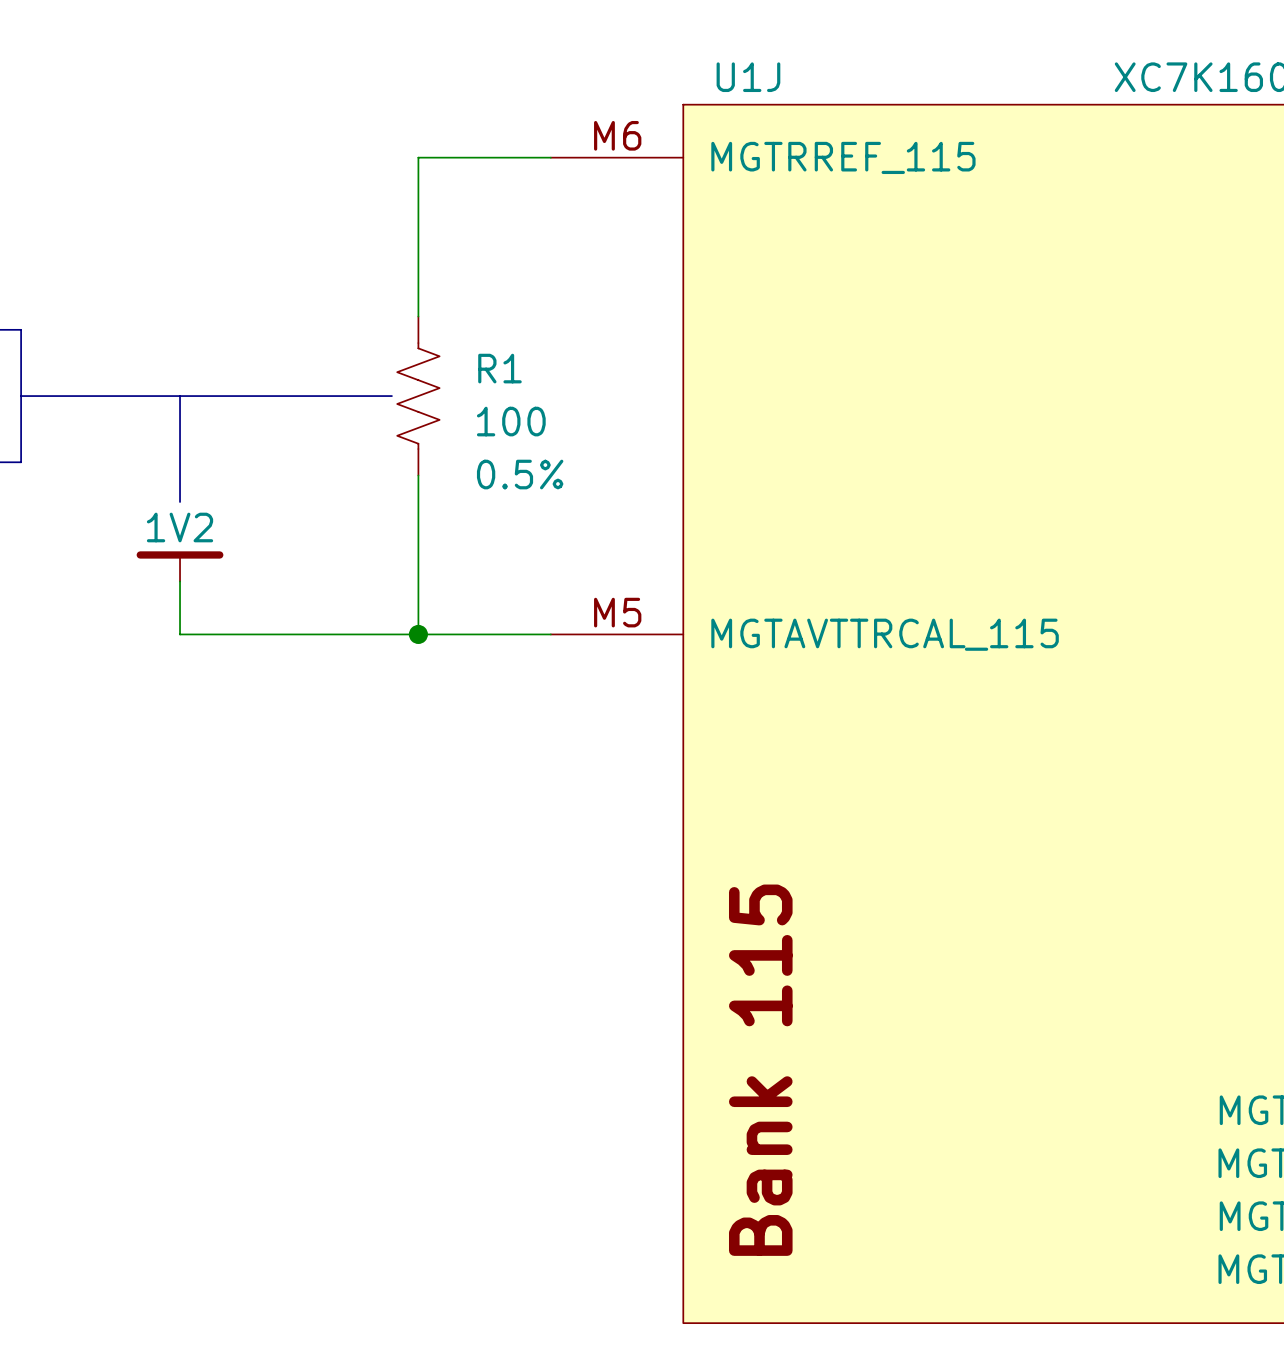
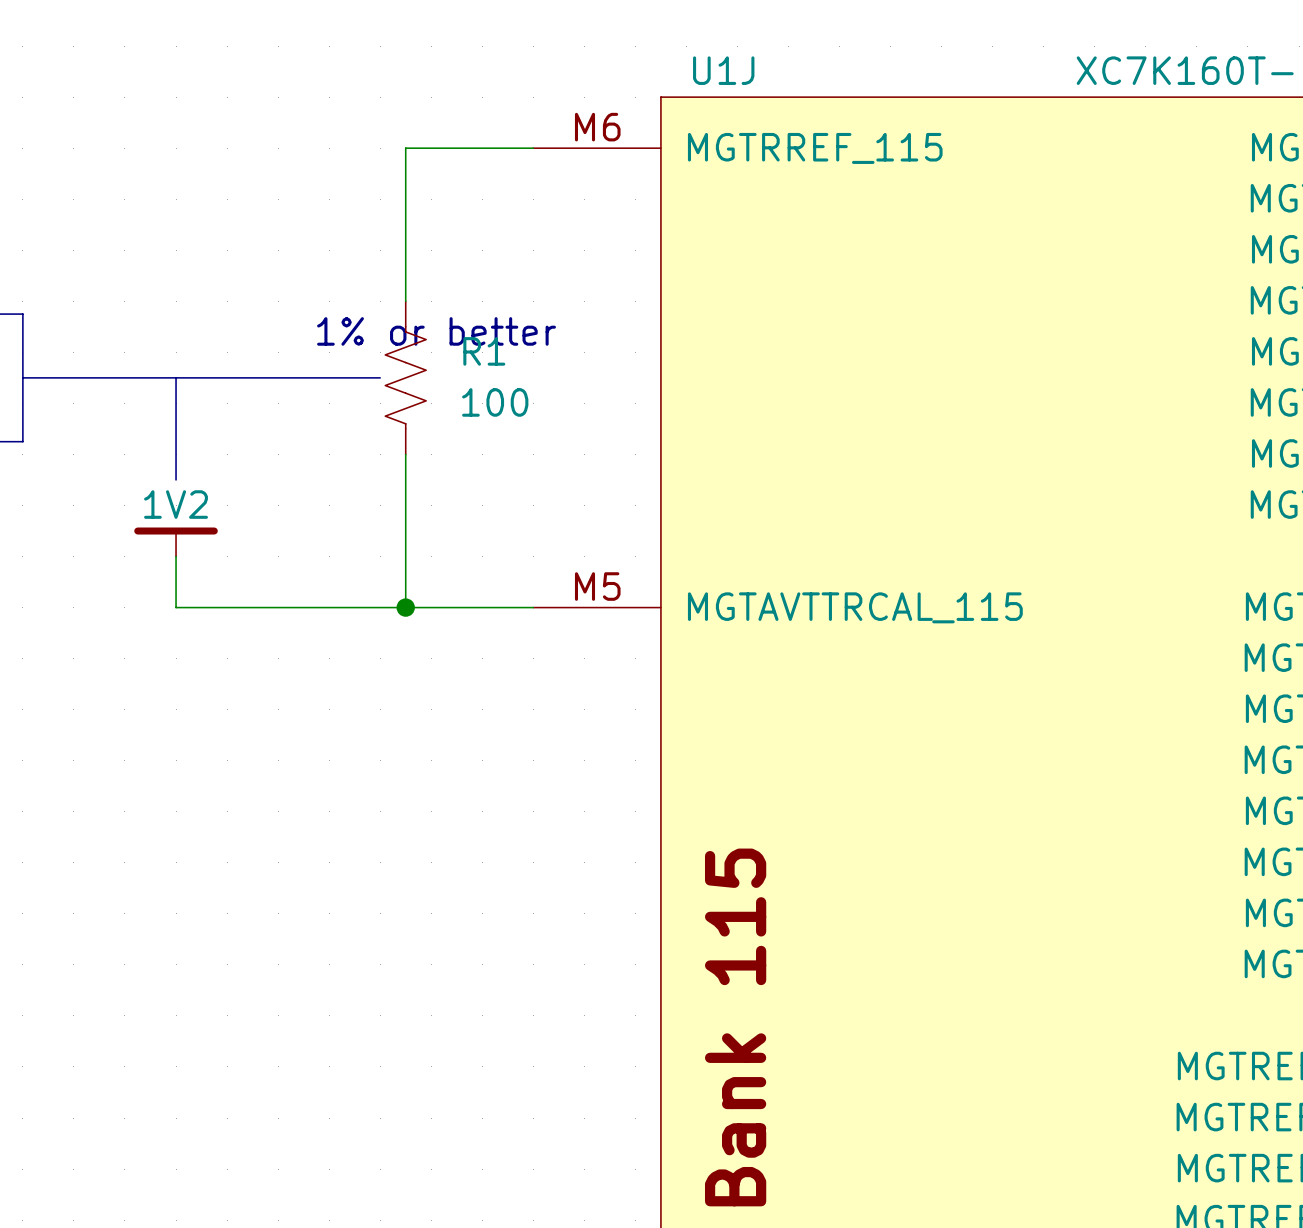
text: none -> 1% or better (436, 331)
R1 text: 0.5% (520, 474) -> none

